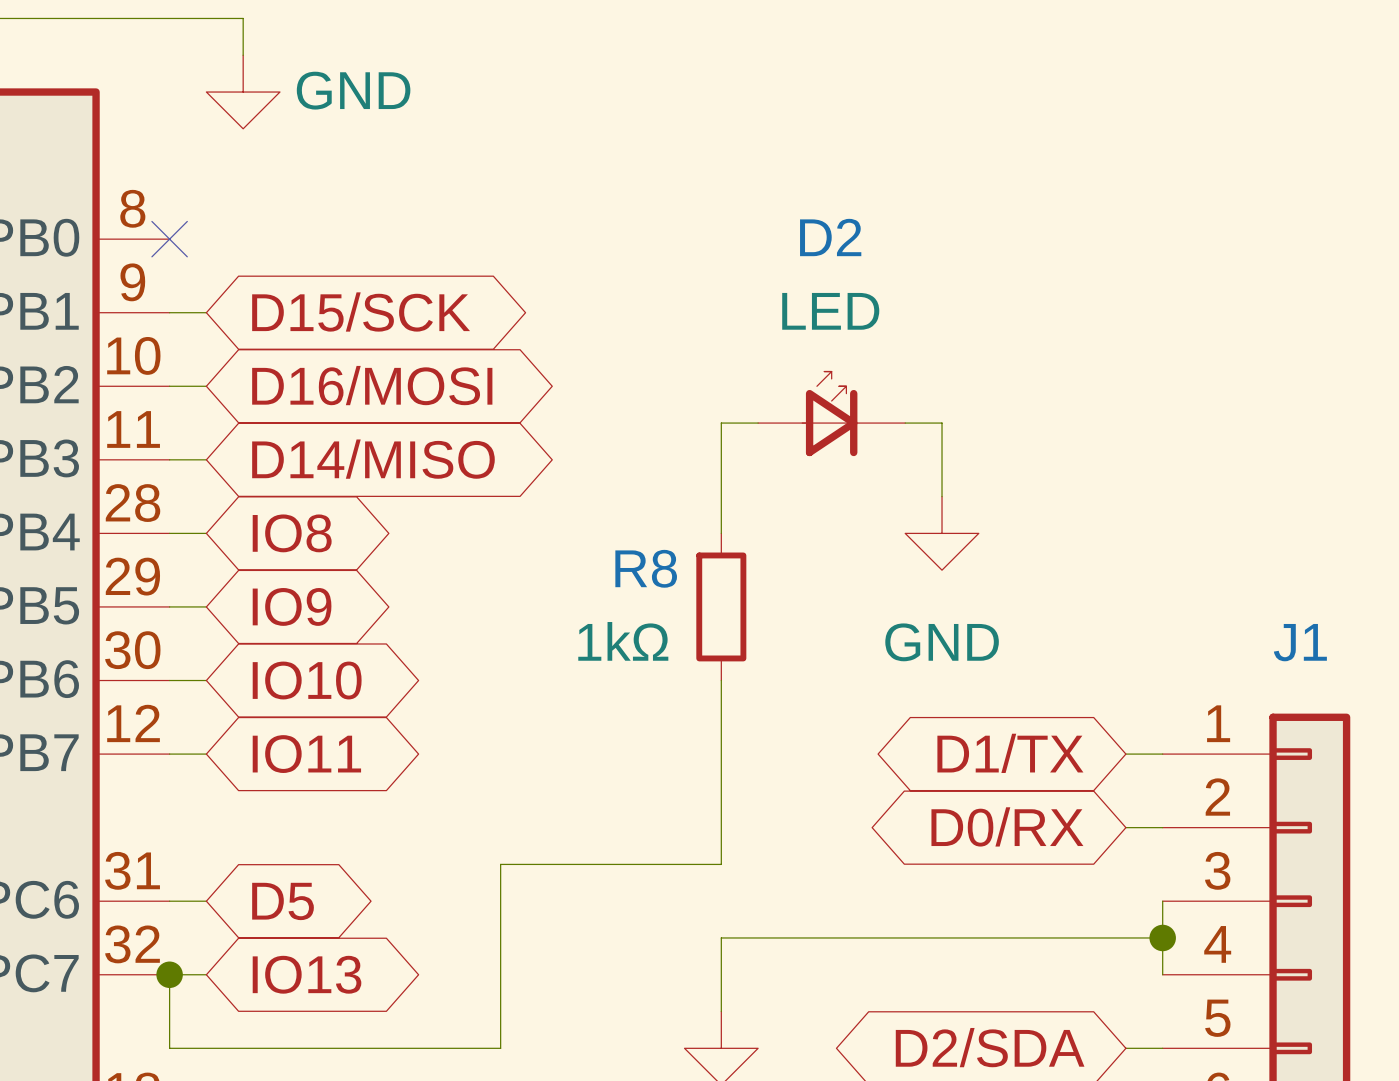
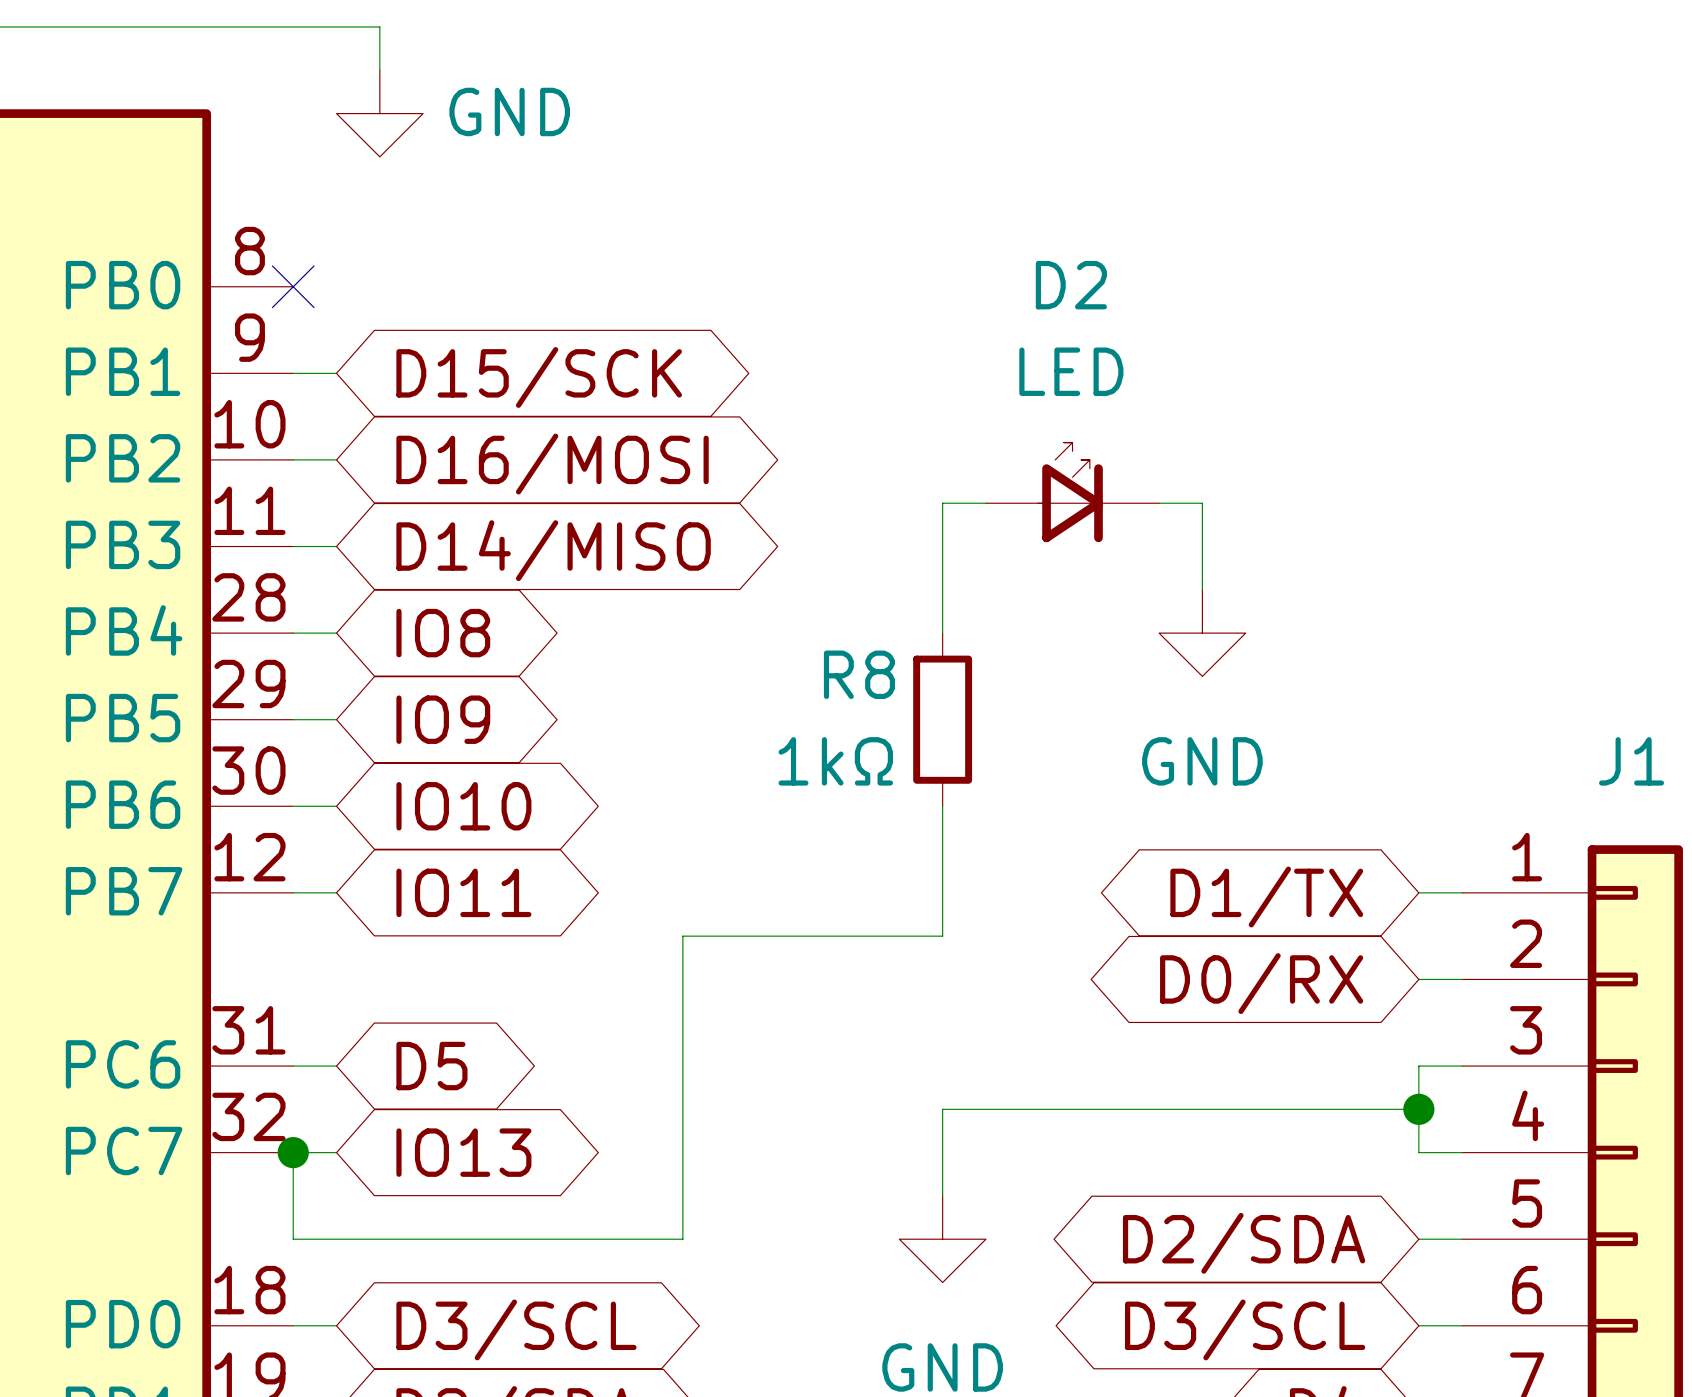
wire: (721, 790) (721, 864) (500, 864) -> (942, 936) (682, 936) (682, 1022)
wire: (1162, 901) (1162, 974) -> (1462, 1066) (1418, 1066) (1418, 1152) (1462, 1152)
wire: (1125, 937) (1162, 937) -> none
junction position: (1162, 937) -> (1418, 1109)

